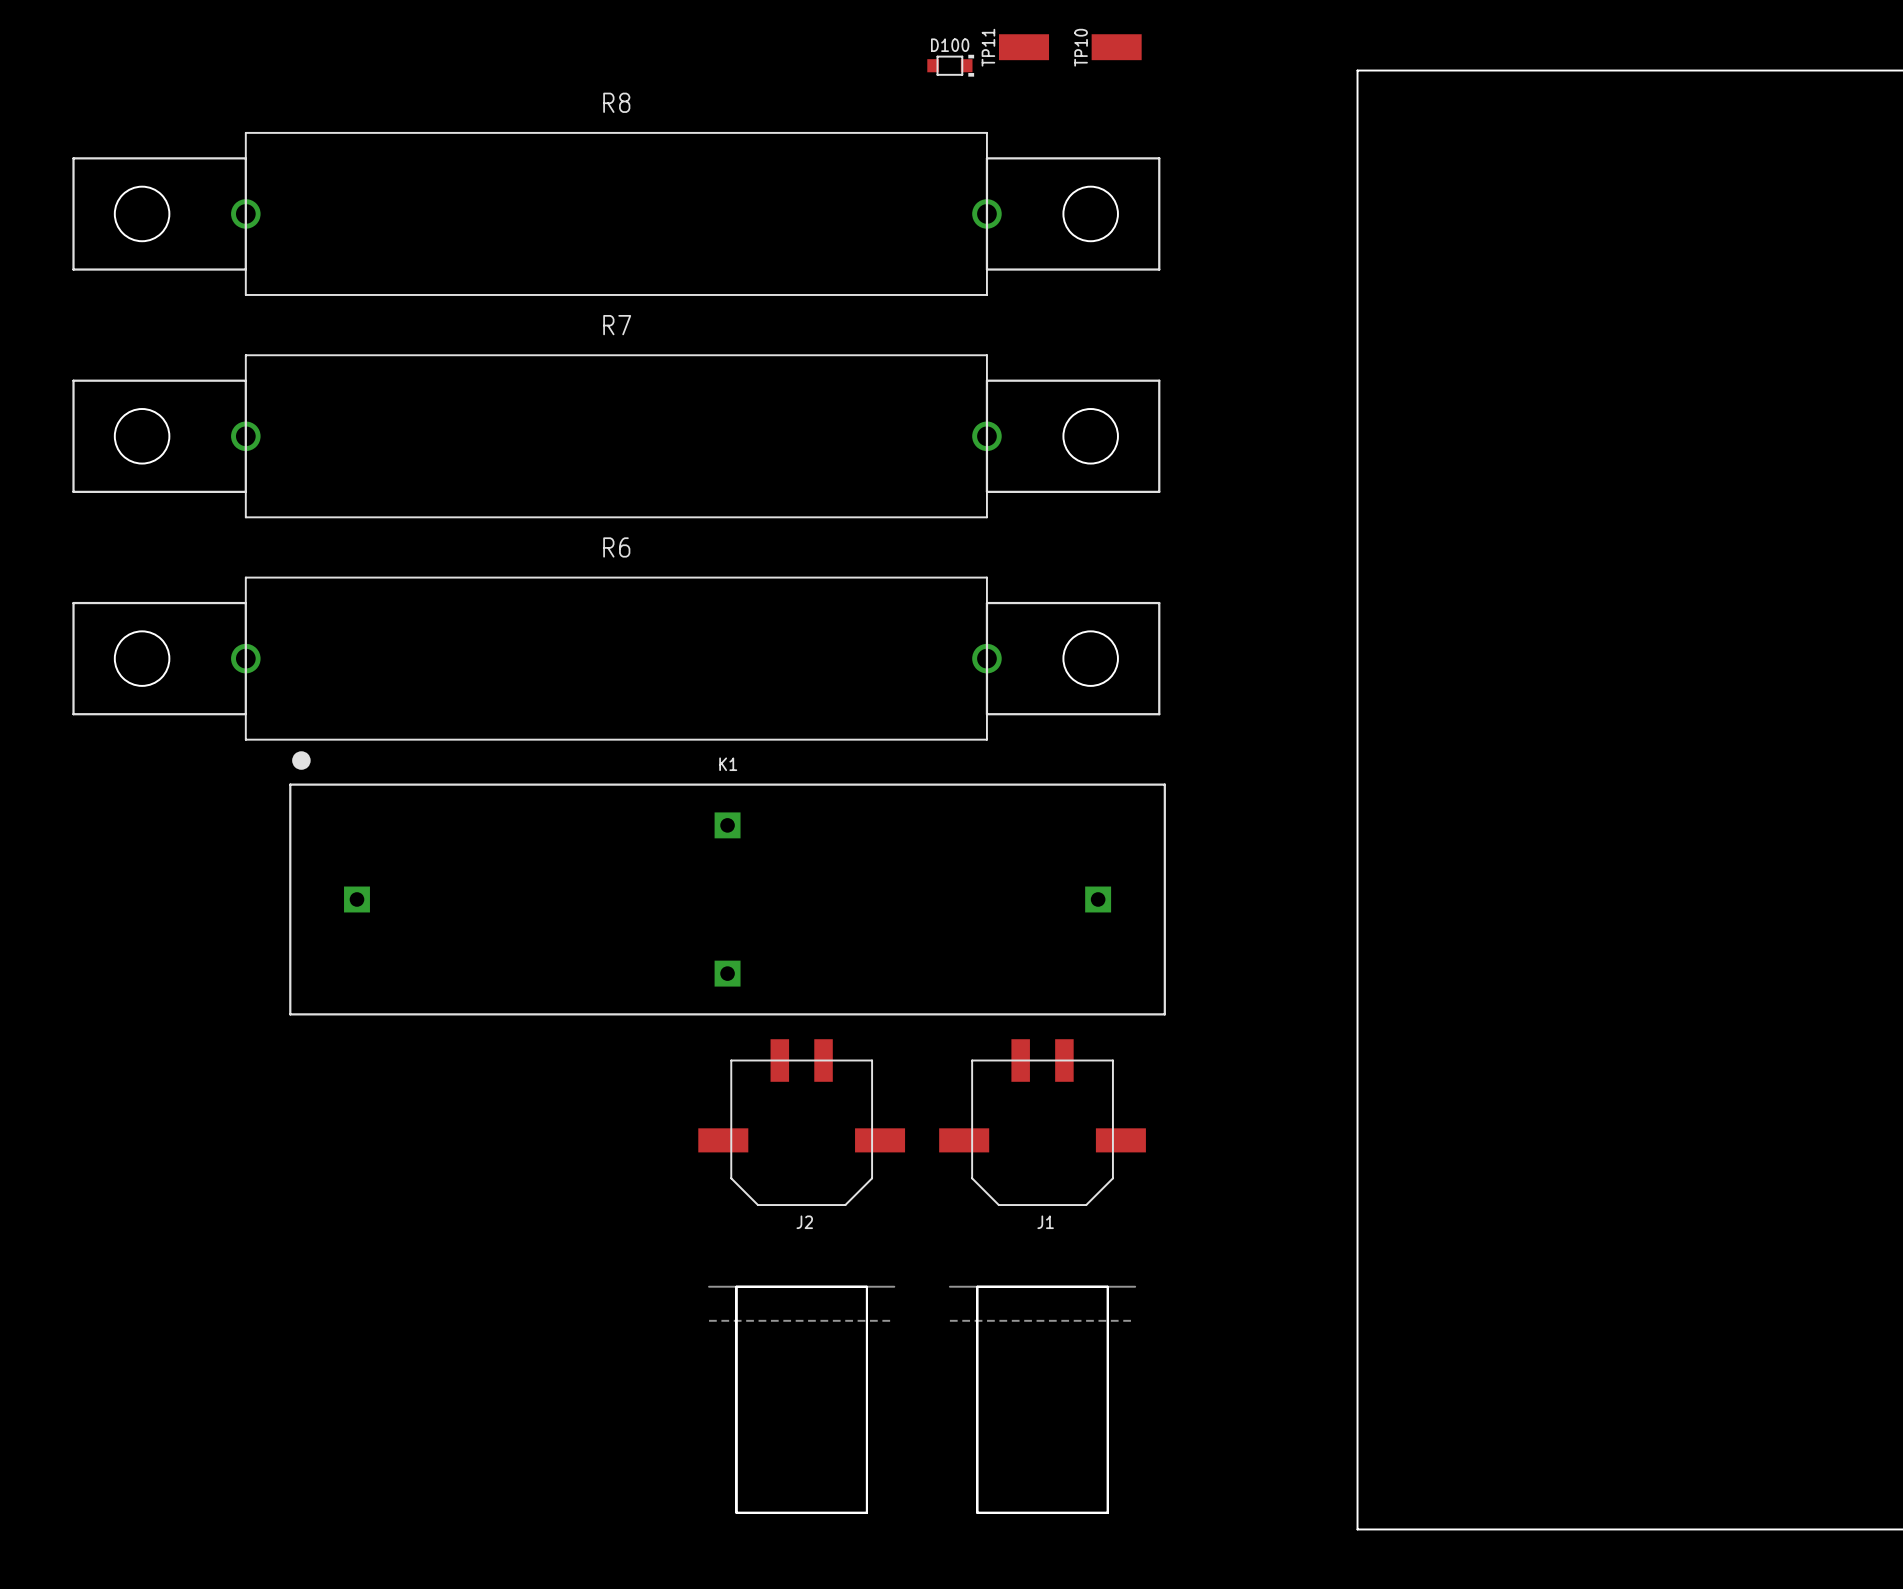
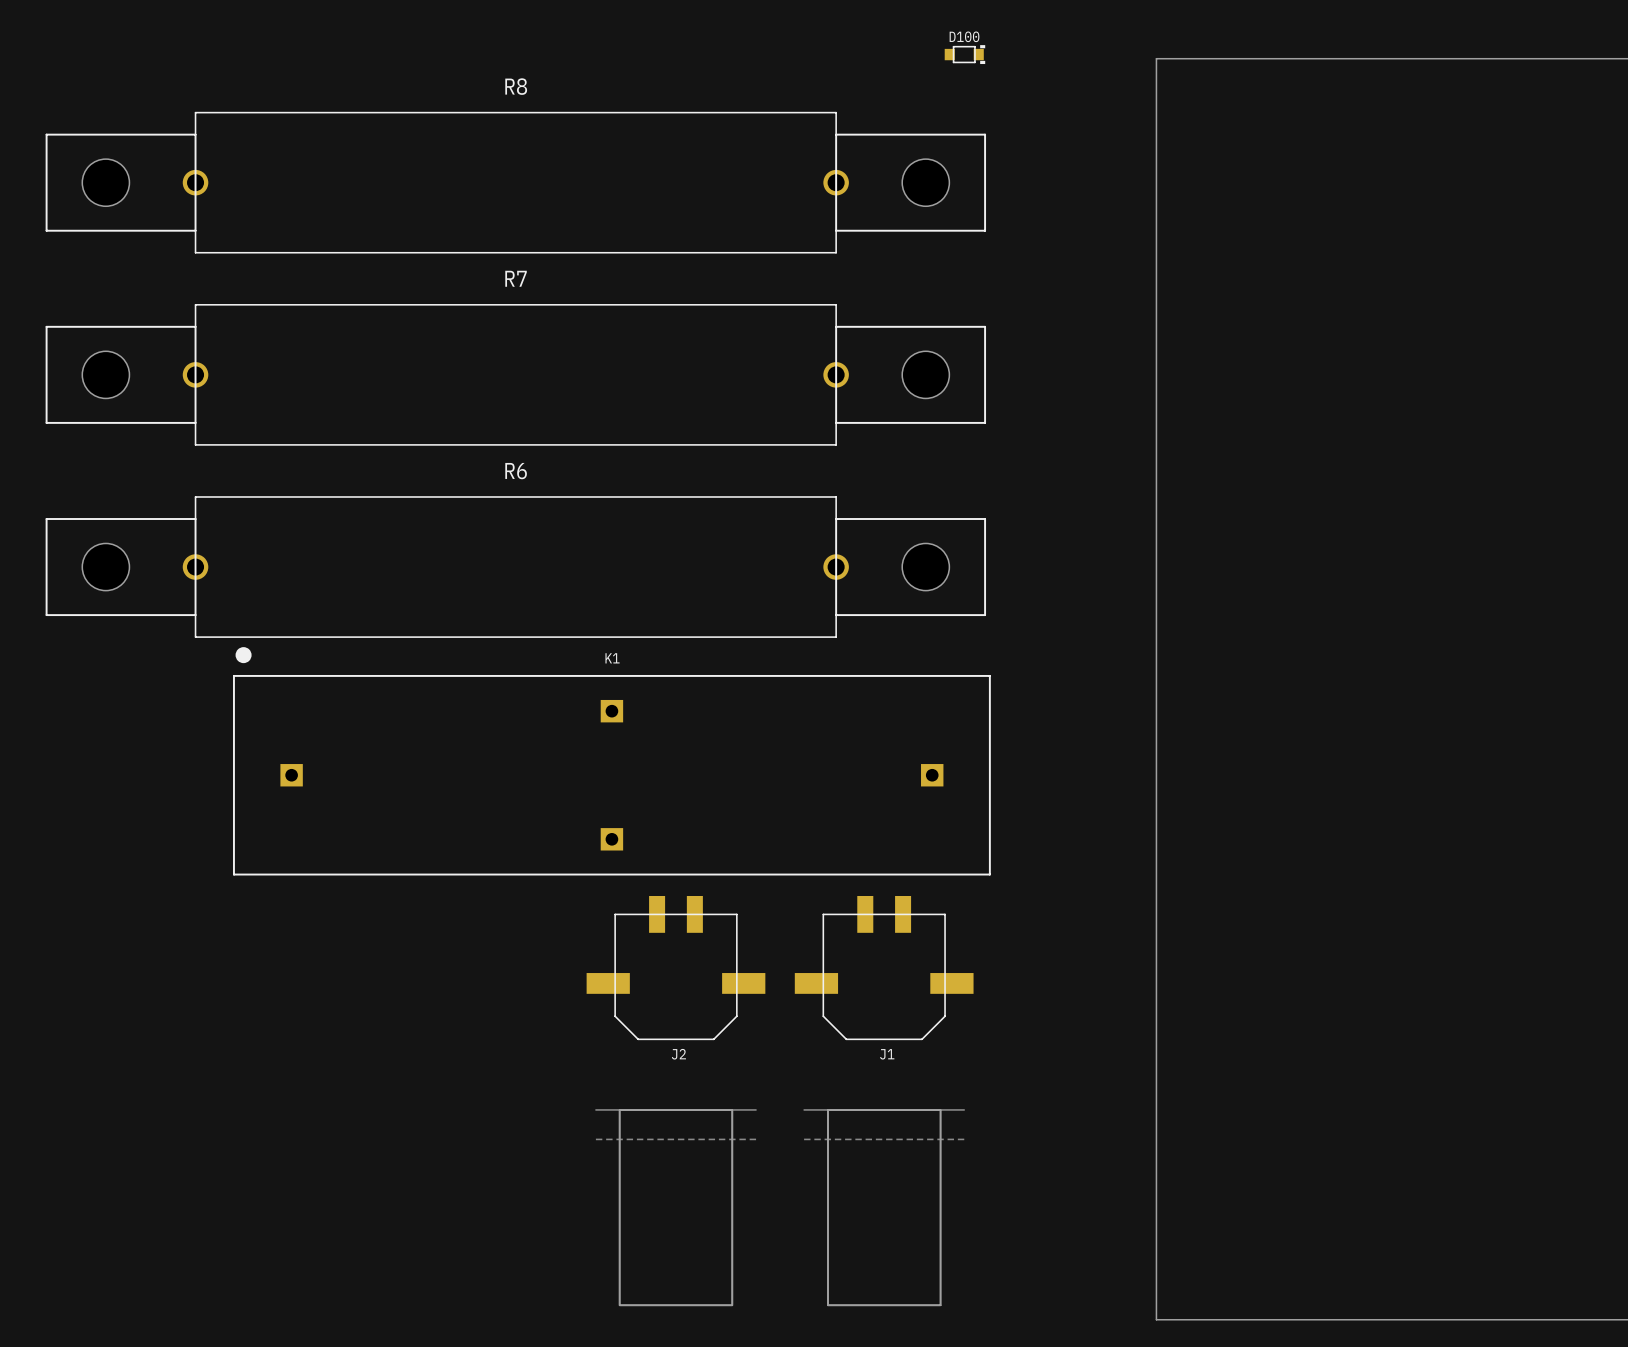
TP11: (1024, 47) -> none
TP10: (1116, 47) -> none
D100 position: (950, 65) -> (964, 54)

